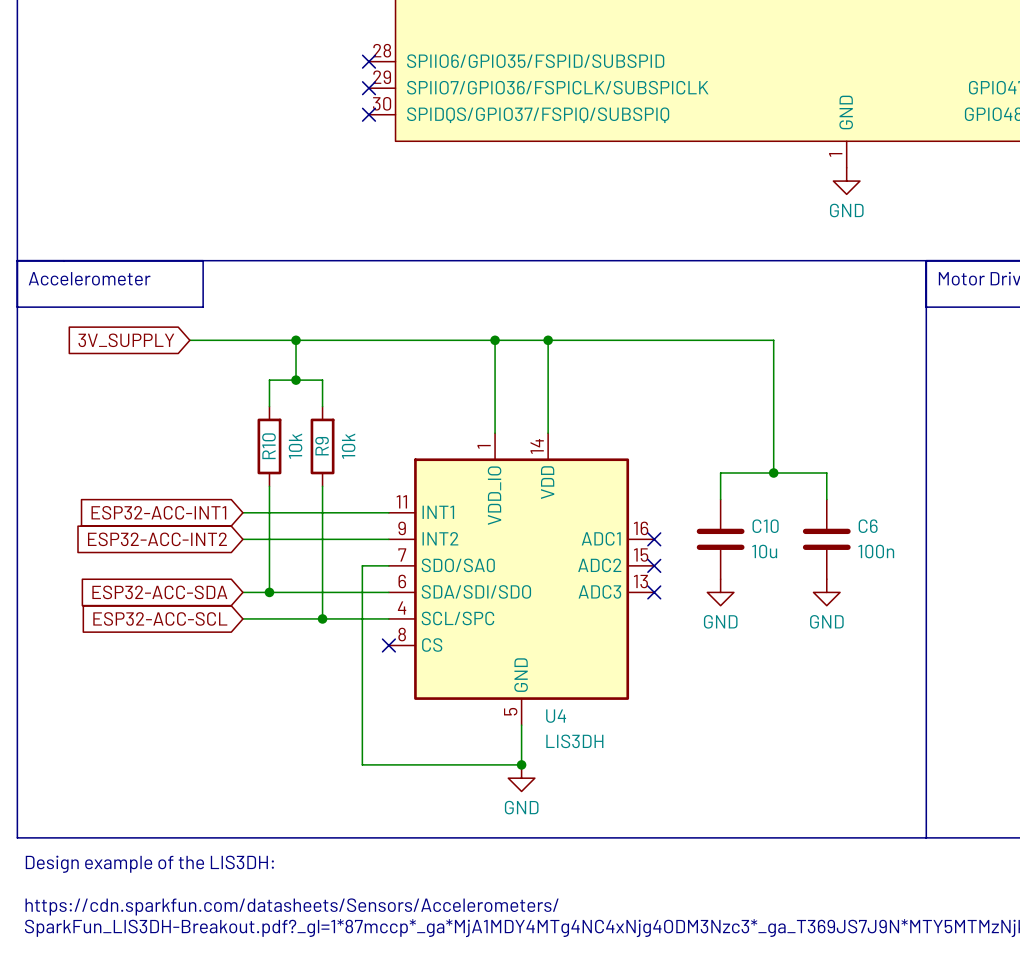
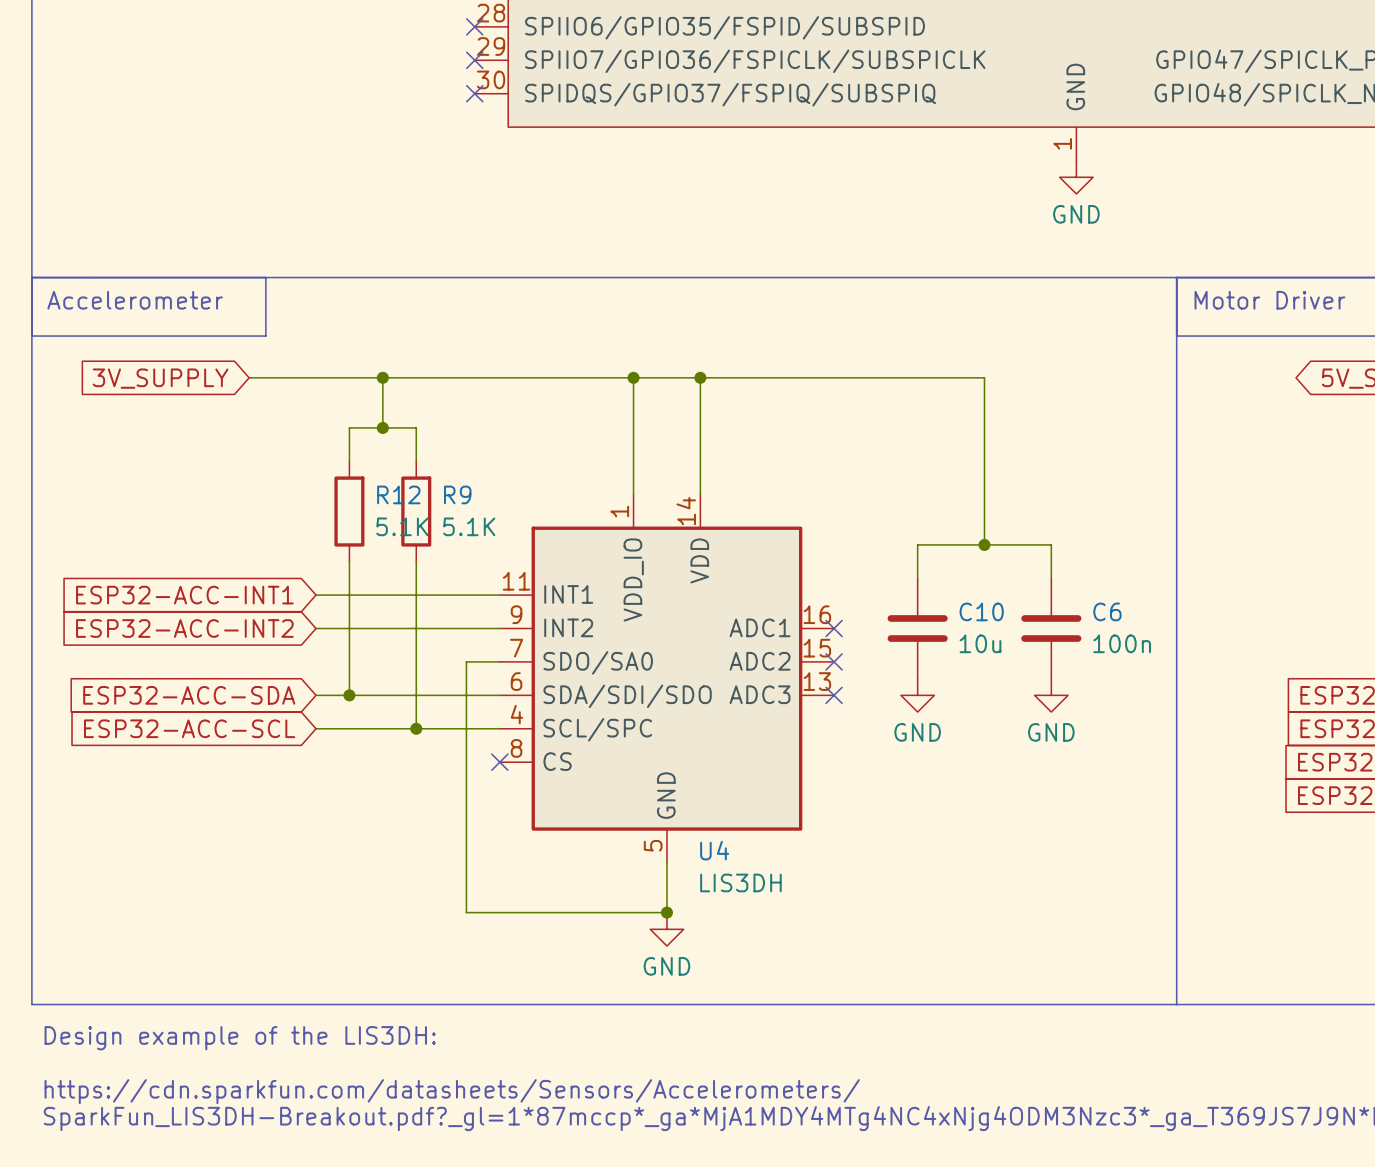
R10 name: R10 (268, 446) -> R12 (398, 494)
R10 value: 10k (295, 446) -> 5.1K (402, 526)
R9 name rotation: 0° (322, 446) -> 90° clockwise (457, 494)
R9 name position: R9 (322, 446) -> R9 (457, 494)
R9 value: 10k (348, 446) -> 5.1K (469, 526)

